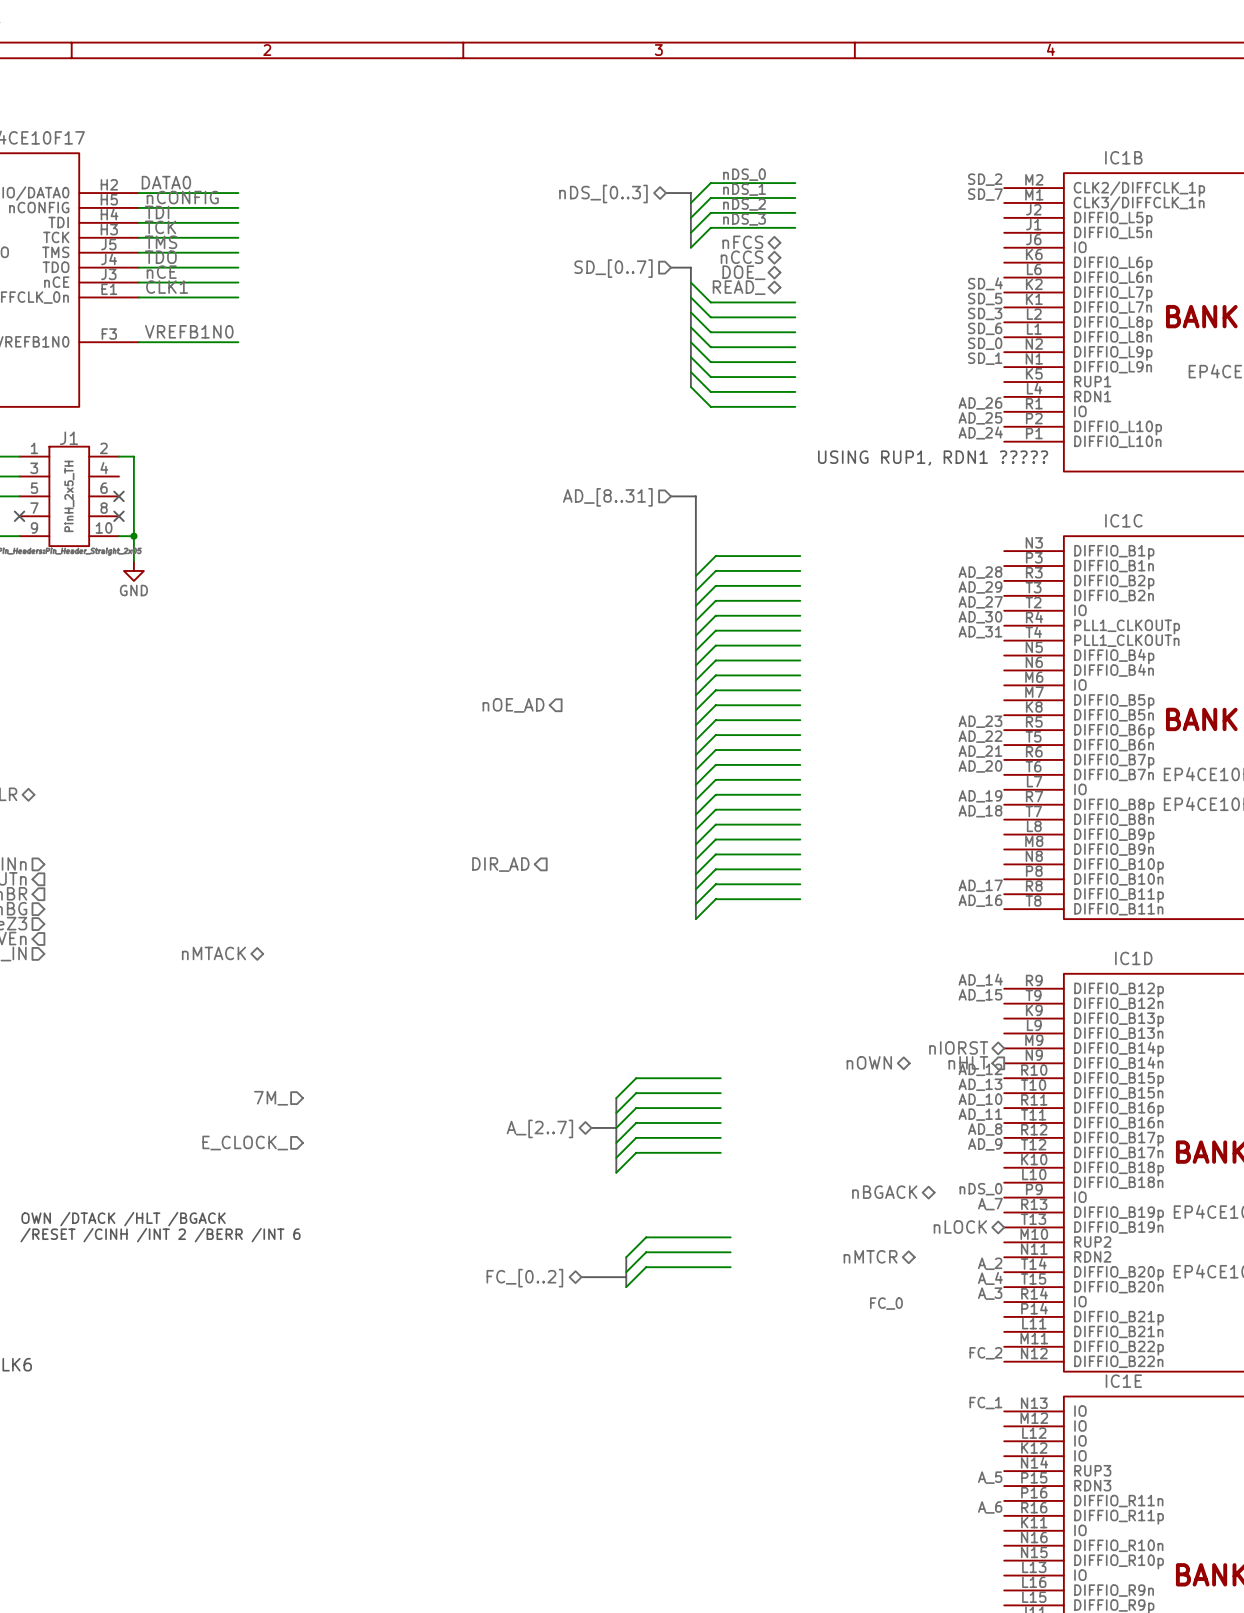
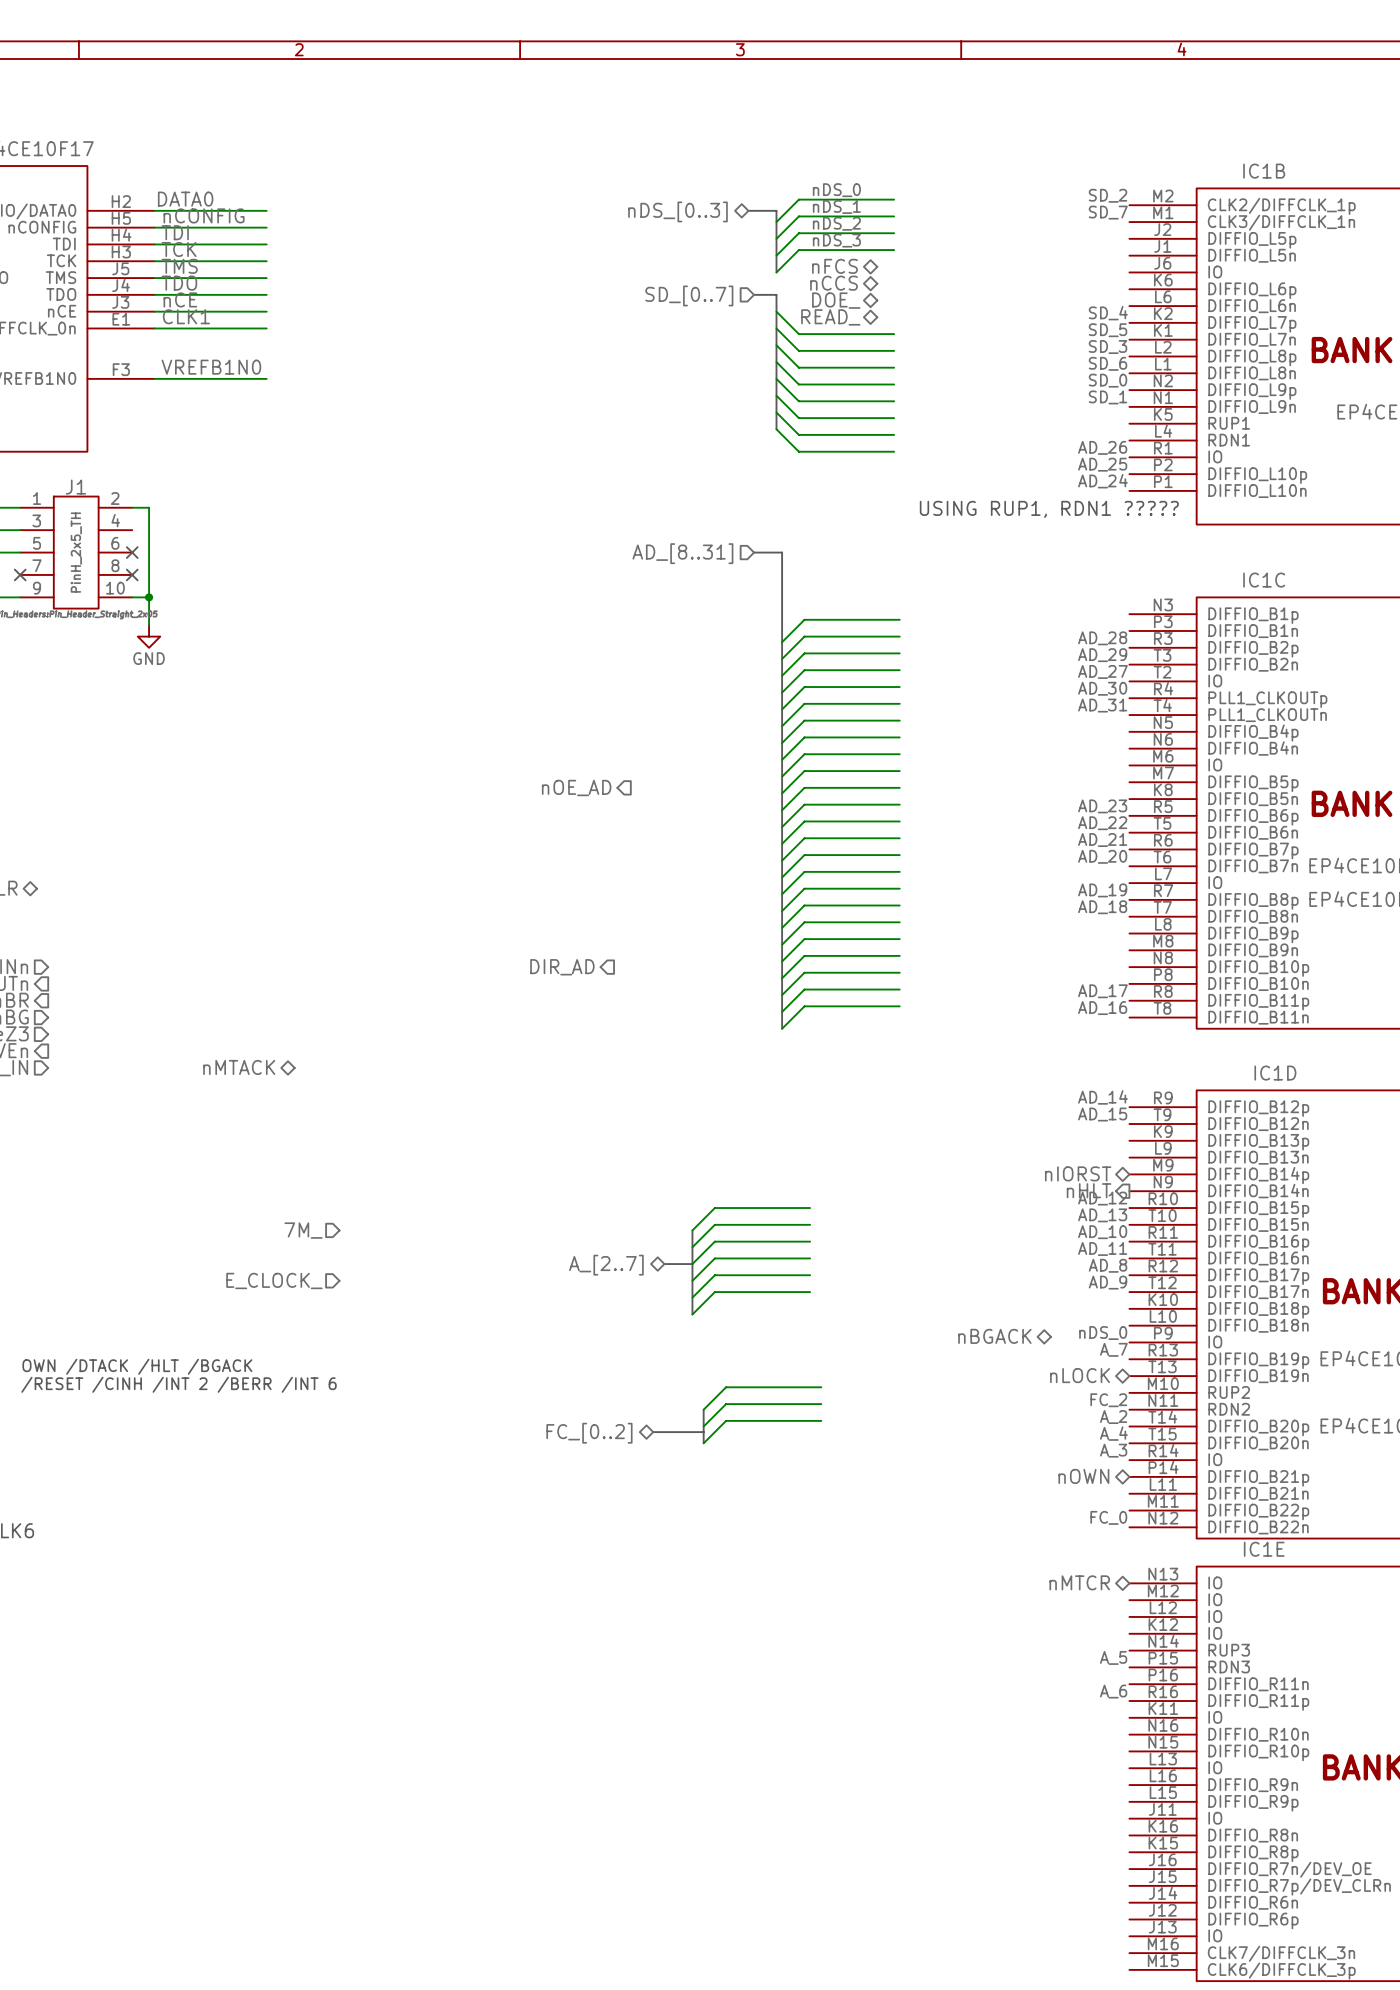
hierarchical label: nOWN (869, 1062) -> none
label: none -> FC_2 (1108, 1400)
hierarchical label position: nMTCR (870, 1256) -> nMTCR (1079, 1582)
label: FC_0 (886, 1303) -> none
hierarchical label: none -> nOWN (1083, 1476)
label: FC_2 (985, 1353) -> FC_0 (1108, 1517)
label: FC_1 (985, 1403) -> none

